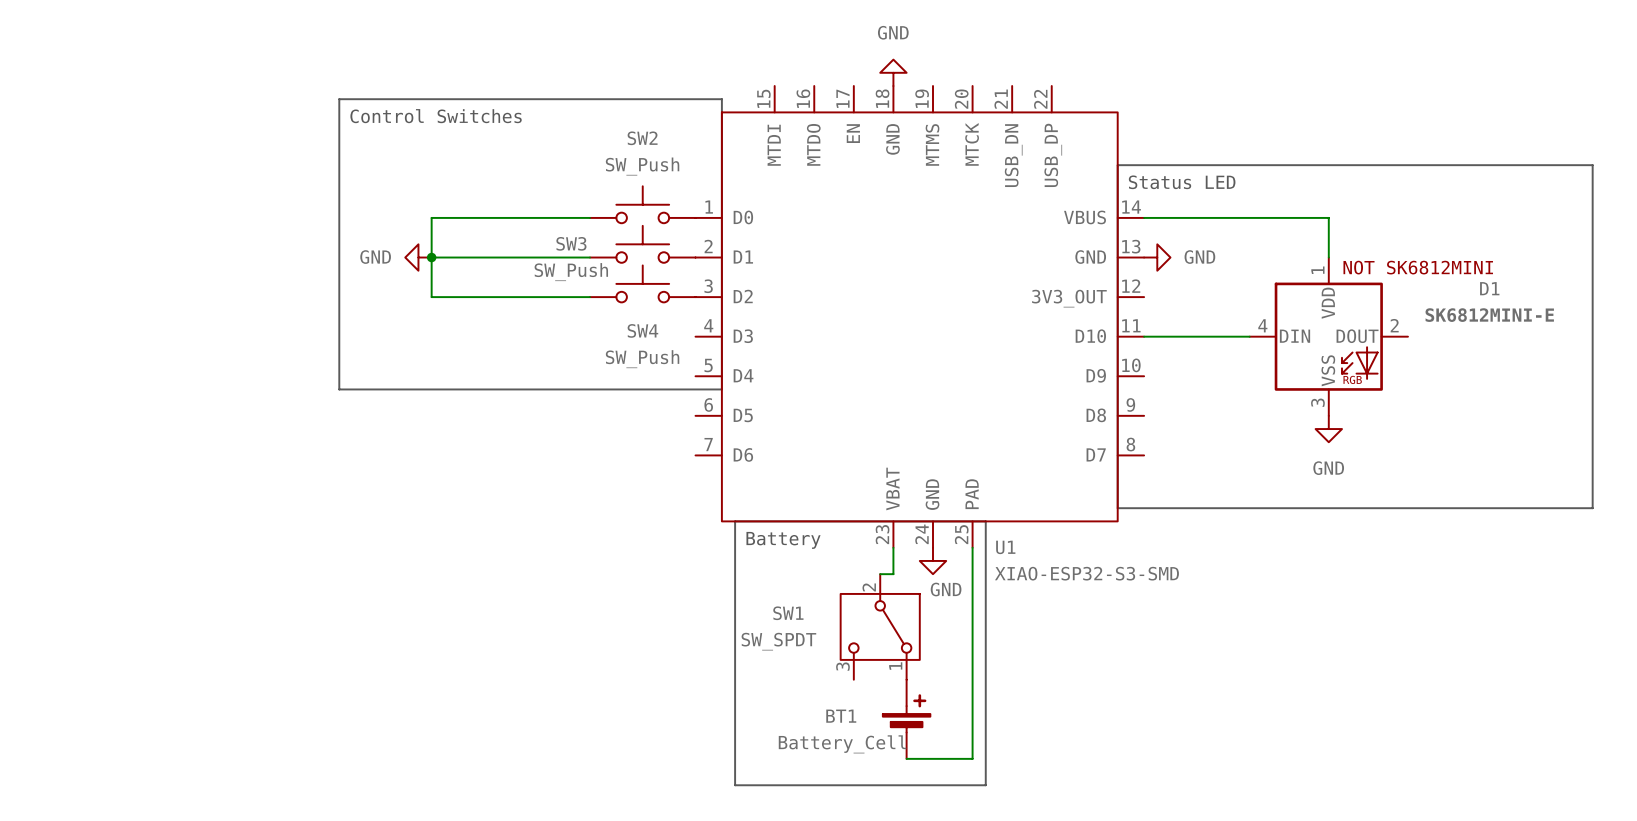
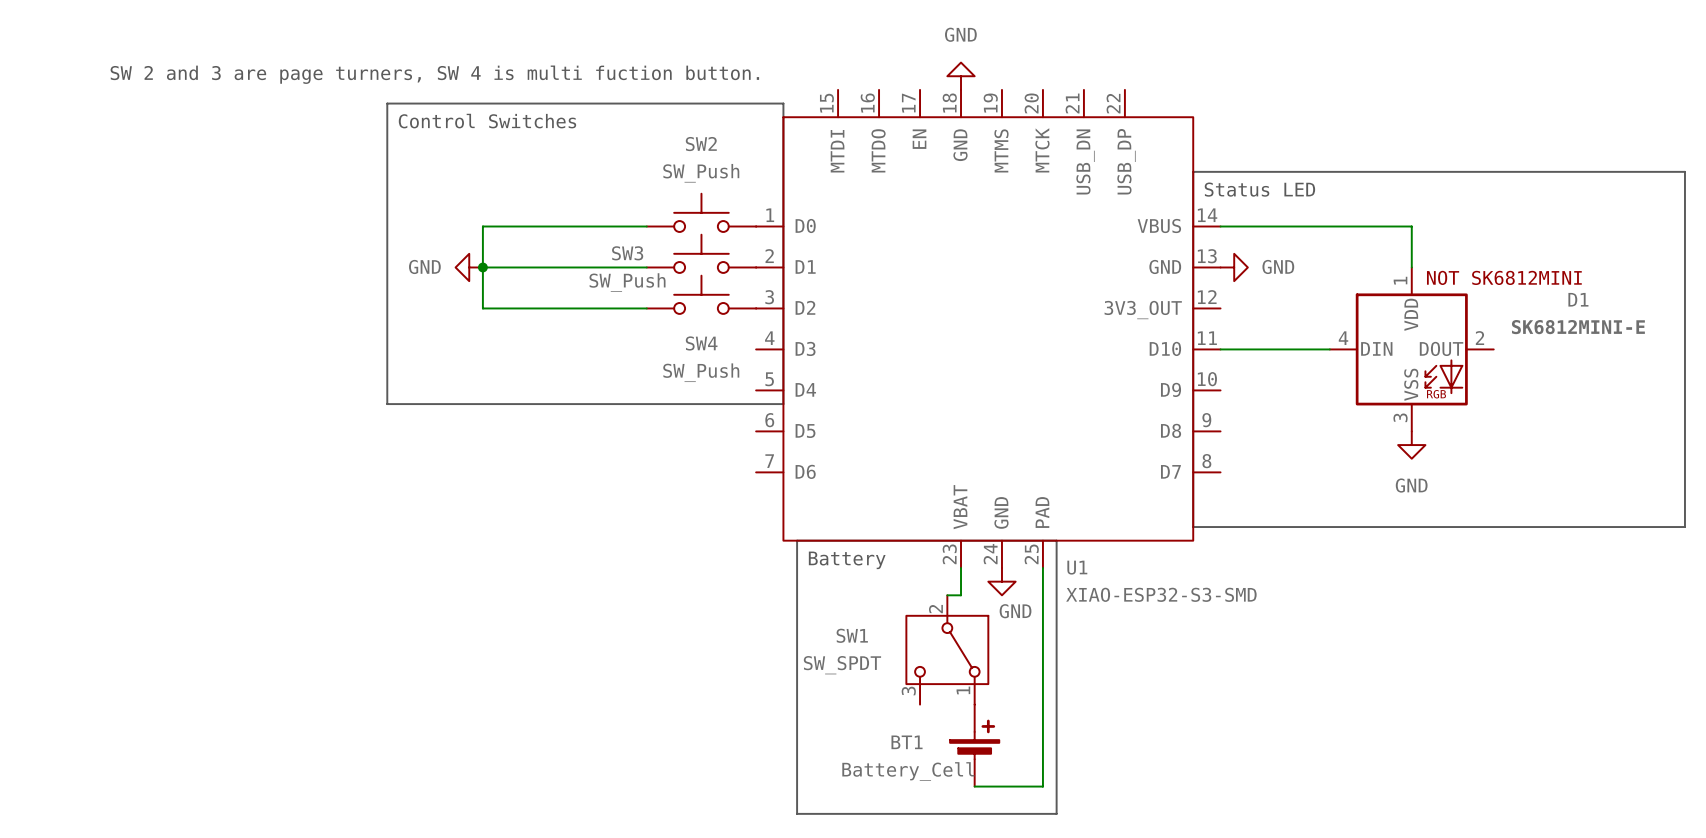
text: none -> SW 2 and 3 are page turners, SW 4 is multi fuction button. (434, 74)

